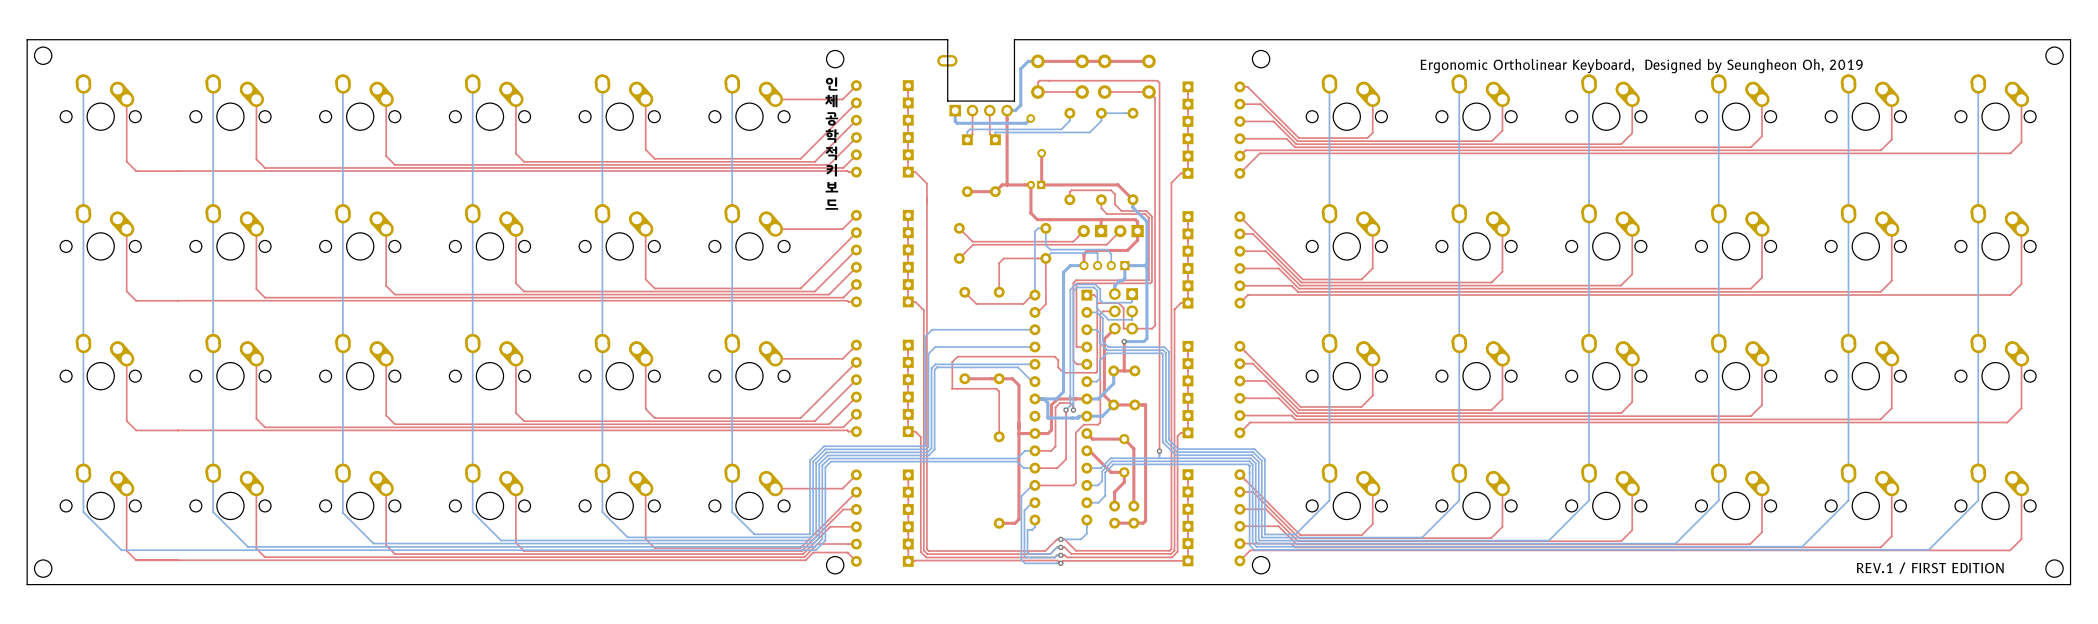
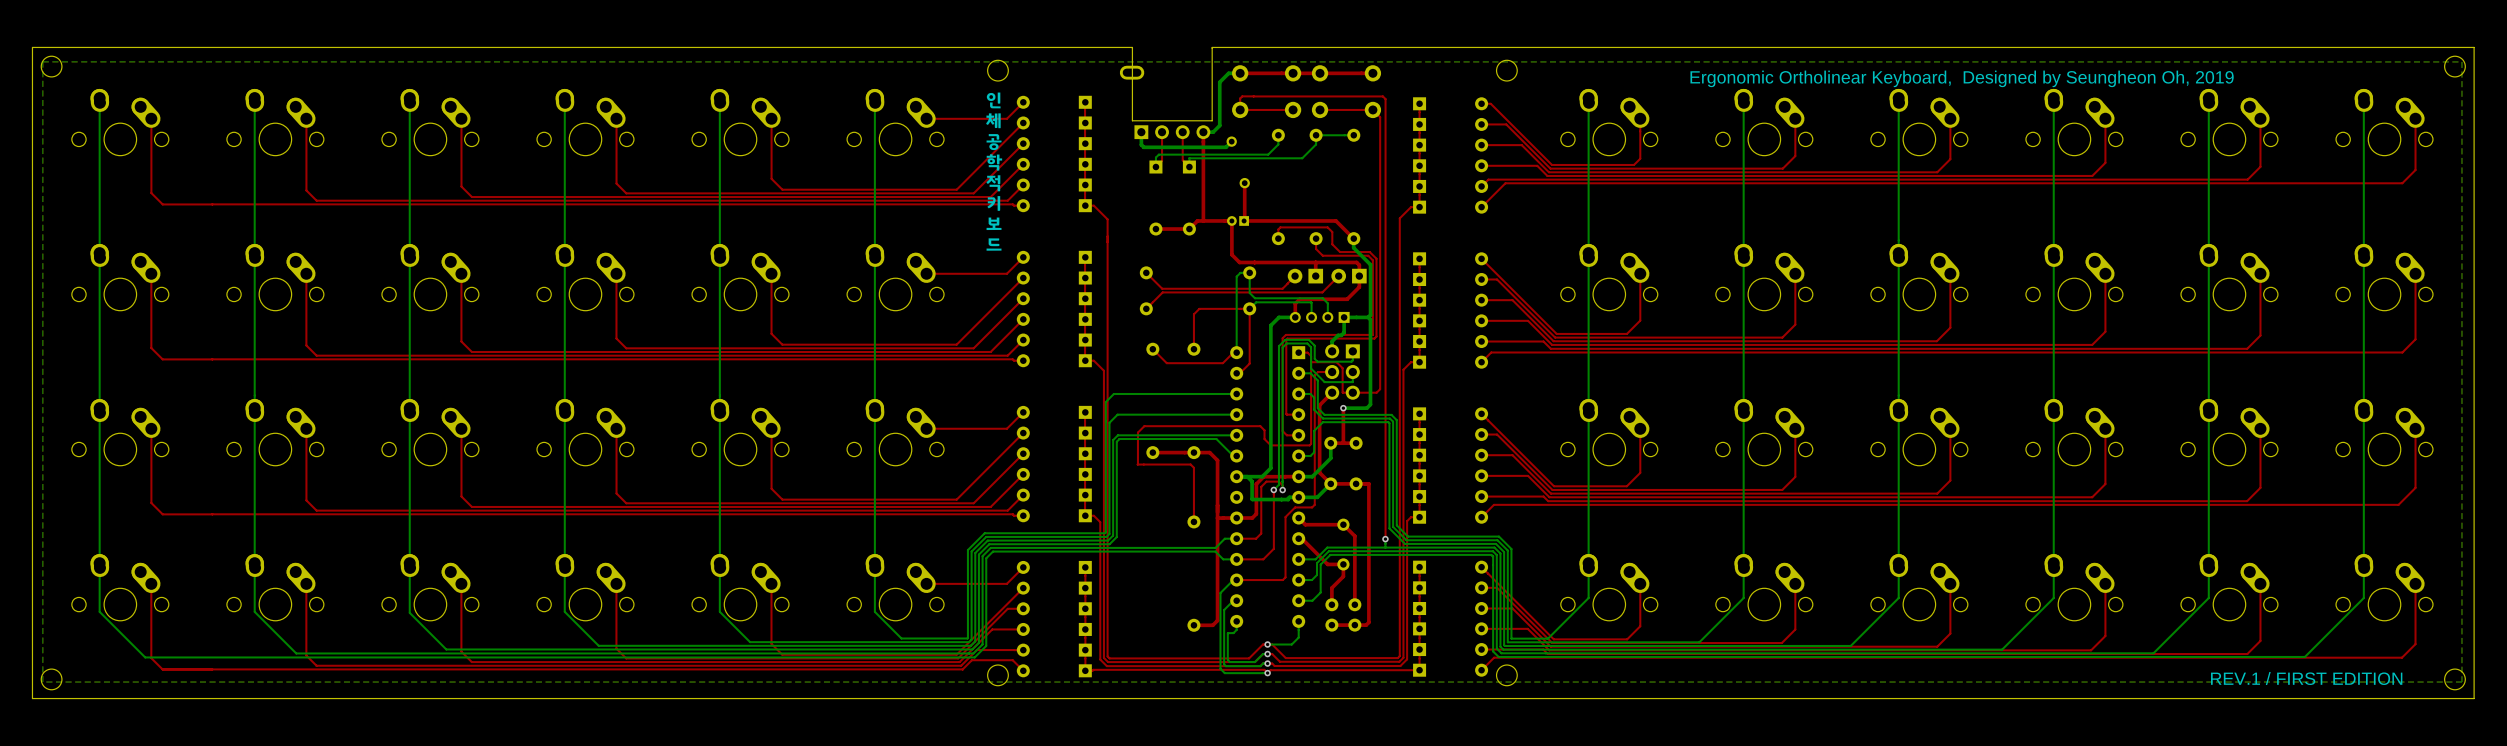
bottom zone outline: none -> (42, 61) (42, 682) (2461, 682) (2461, 61) (42, 61)

